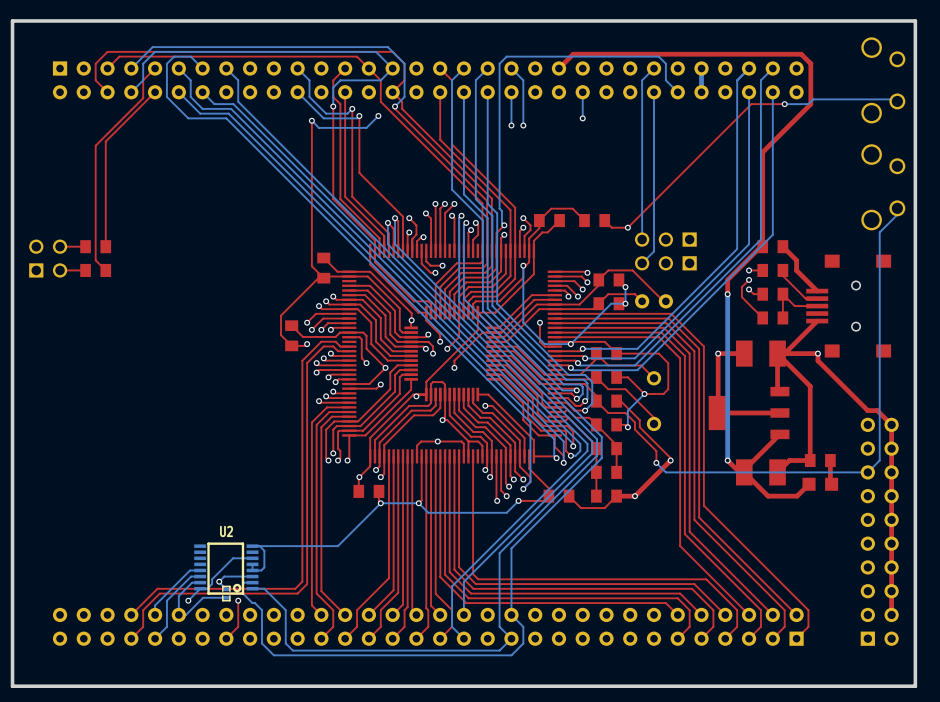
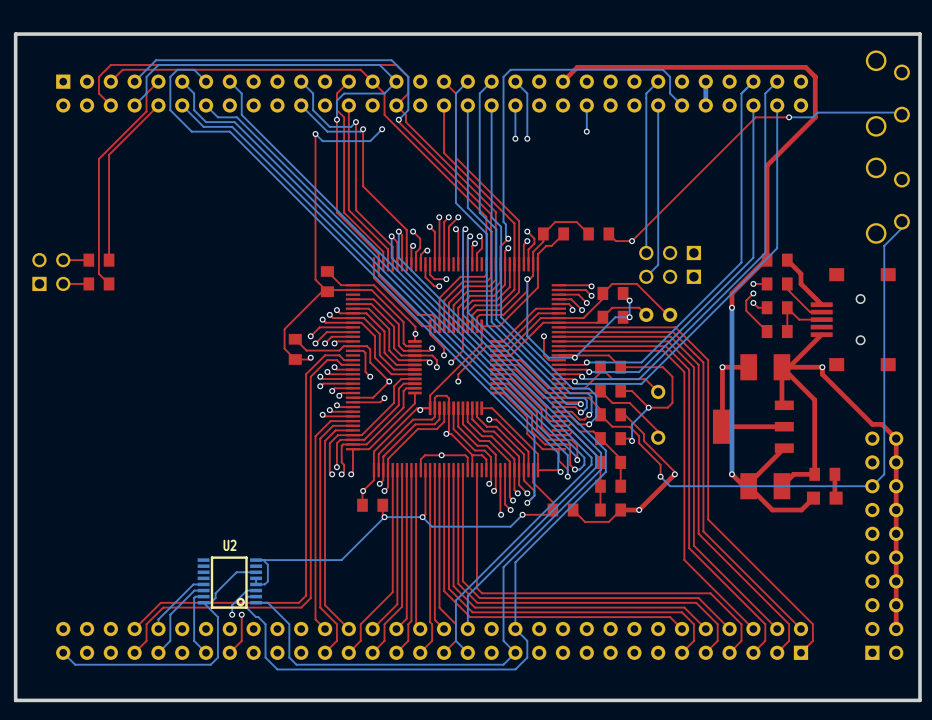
bottom track: (243, 576) (224, 576) (219, 582) (226, 589) -> (246, 590) (232, 605) (232, 614)
via: (219, 581) -> none
bottom track: (190, 584) (178, 595) (178, 614) (185, 614) (203, 597) (226, 597) -> (194, 598) (194, 640) (206, 652)
bottom track: (200, 588) (188, 600) -> (203, 602) (217, 617) (217, 657) (210, 664) (75, 664) (63, 652)
part: (226, 593) -> none
via: (188, 600) -> none
via: none -> (232, 614)

